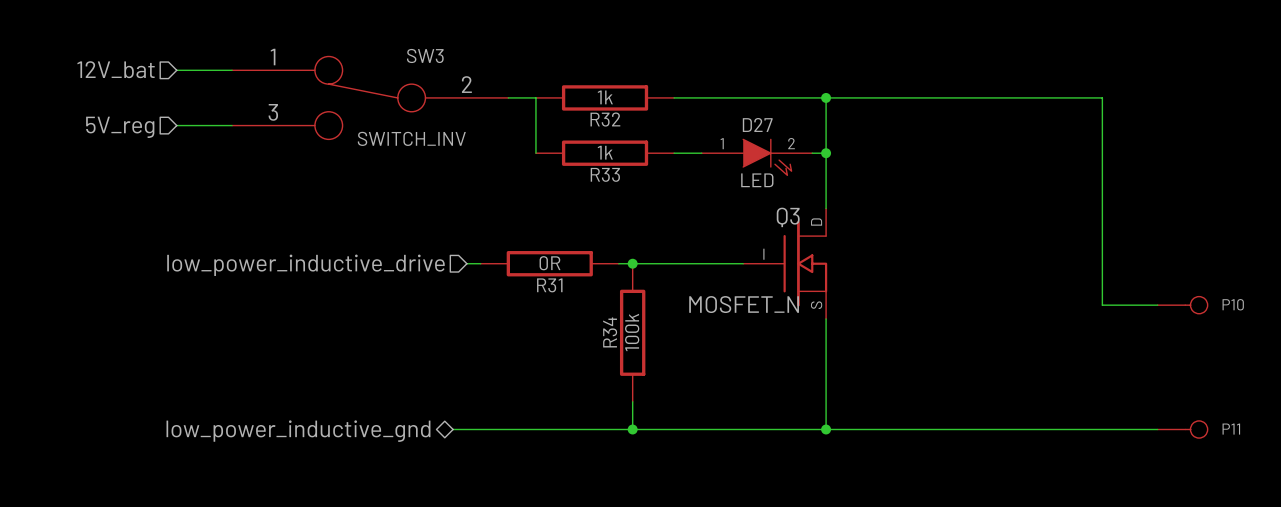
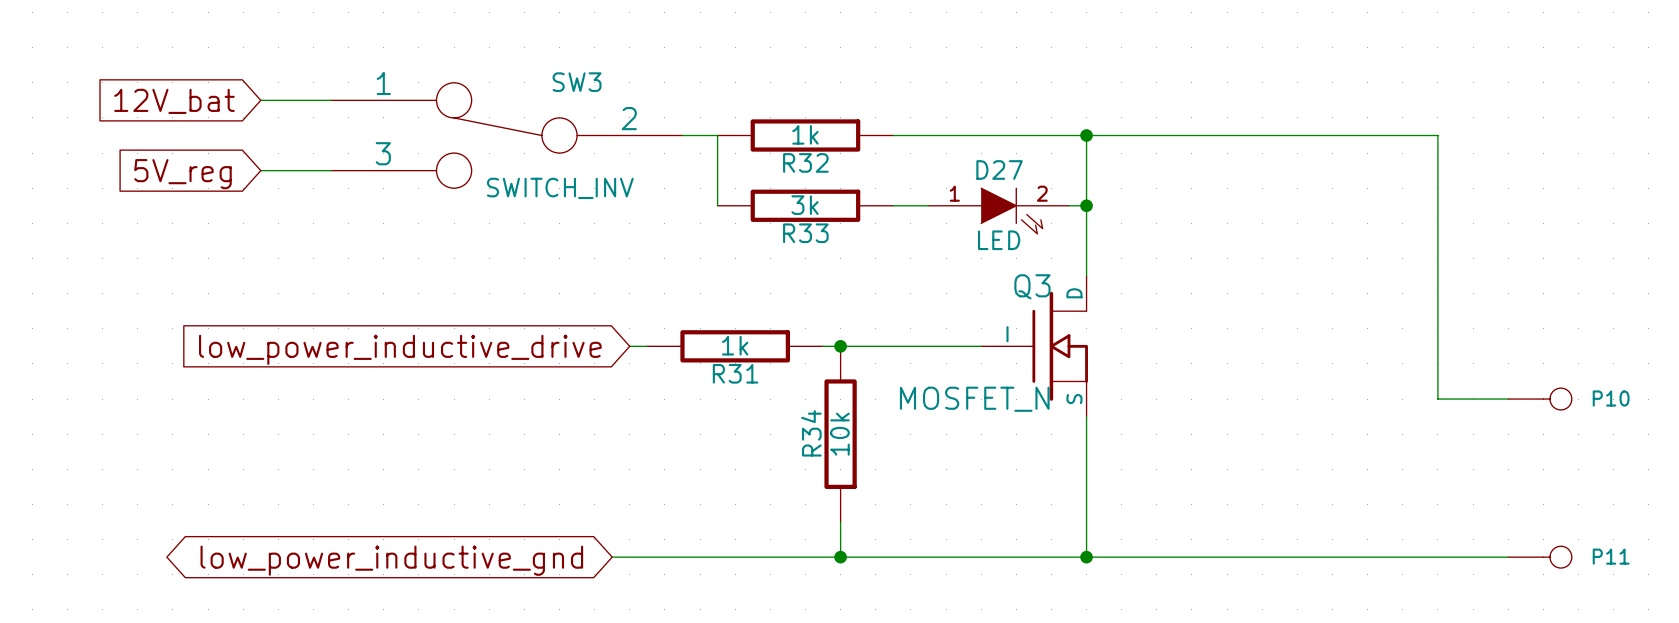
hierarchical label: 12V_bat (116, 69) -> none
global label: none -> 12V_bat (174, 101)
hierarchical label: 5V_reg (120, 127) -> none
global label: none -> 5V_reg (183, 174)
R33 value: 1k (605, 152) -> 3k (805, 205)
R31 value: 0R (550, 263) -> 1k (735, 345)
hierarchical label: low_power_inductive_drive (305, 265) -> none
global label: none -> low_power_inductive_drive (400, 349)
R34 value: 100k (632, 332) -> 10k (839, 434)
hierarchical label: low_power_inductive_gnd (298, 431) -> none
global label: none -> low_power_inductive_gnd (391, 560)

